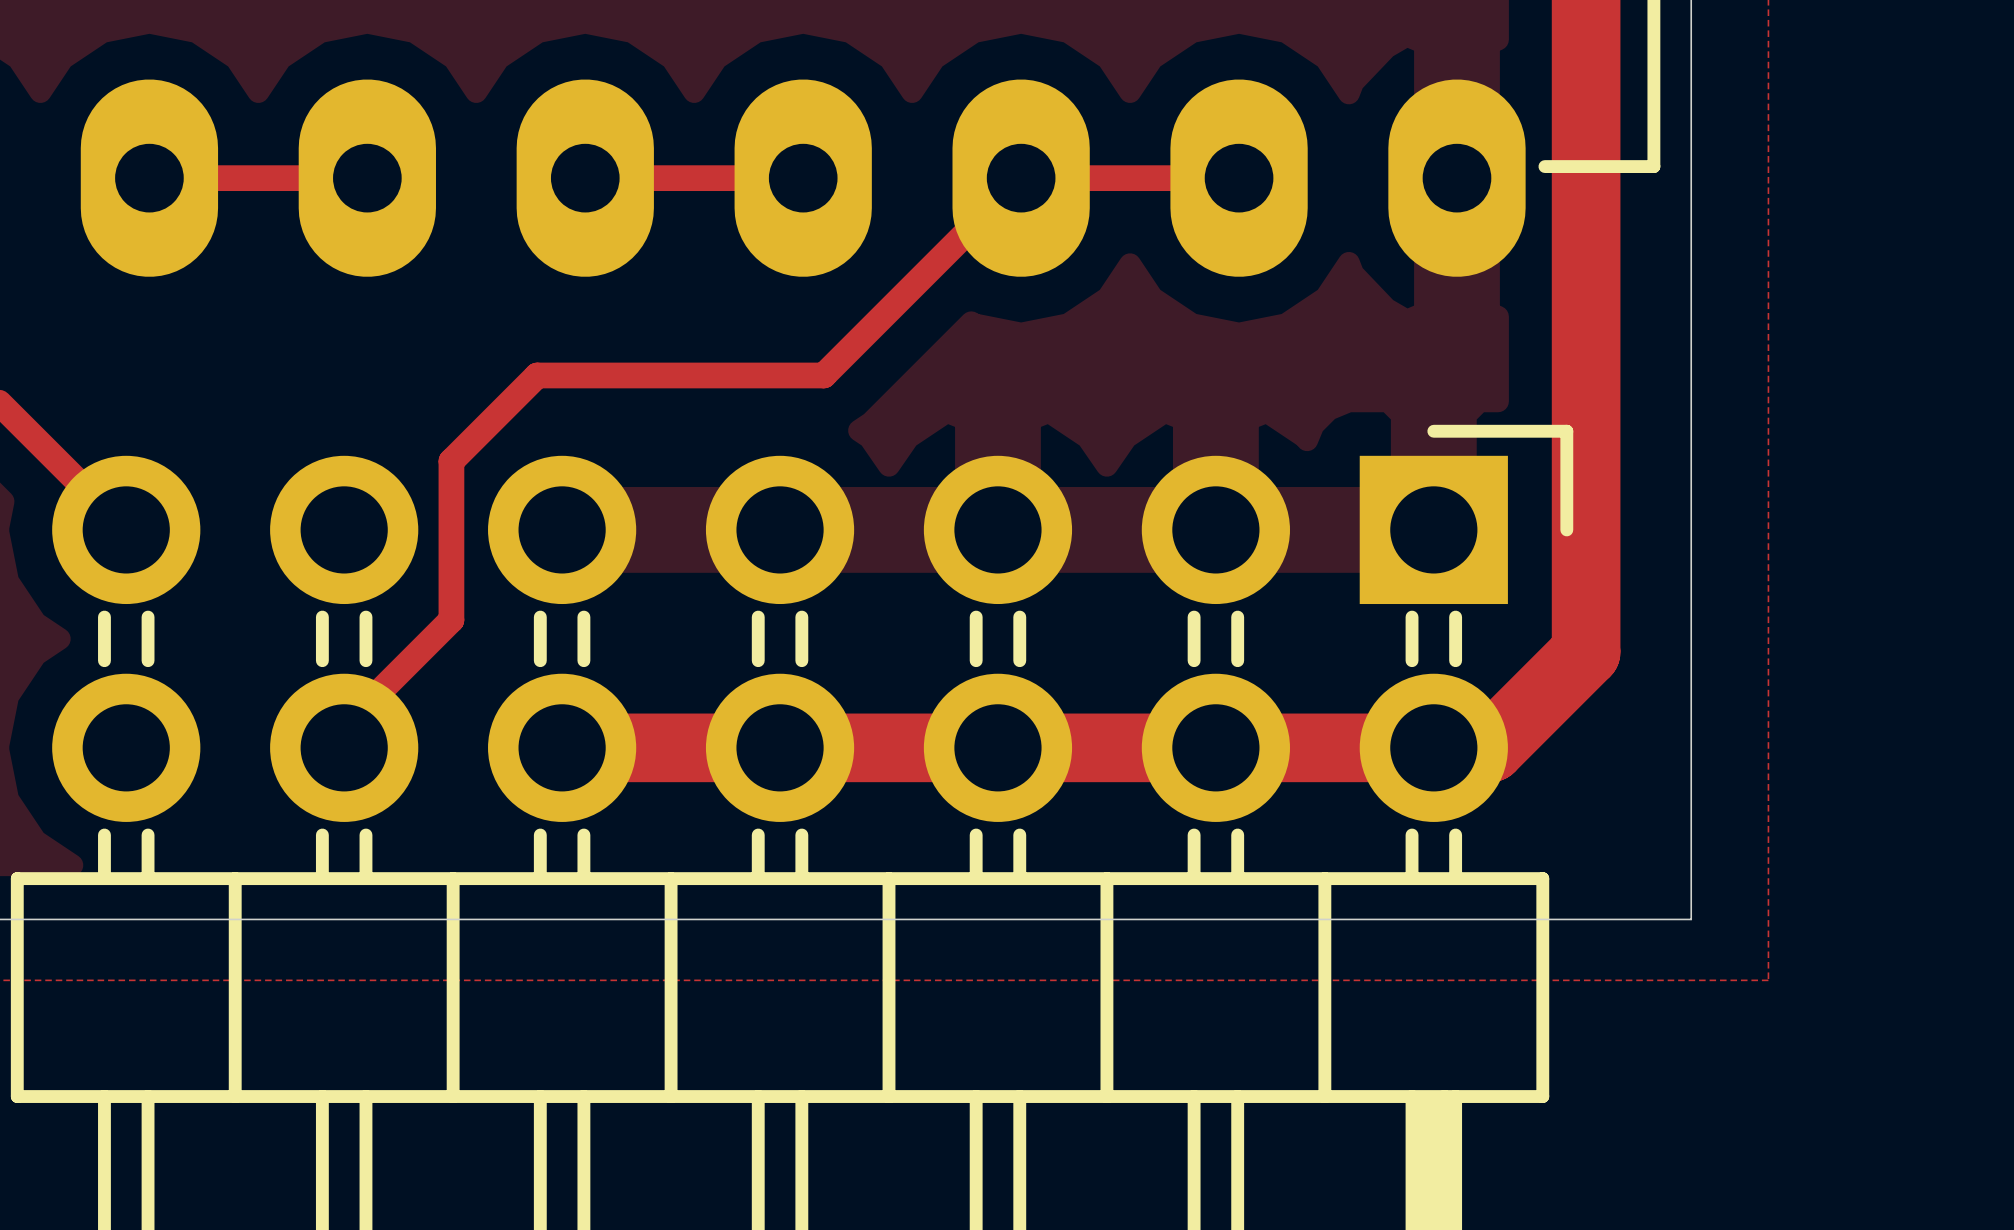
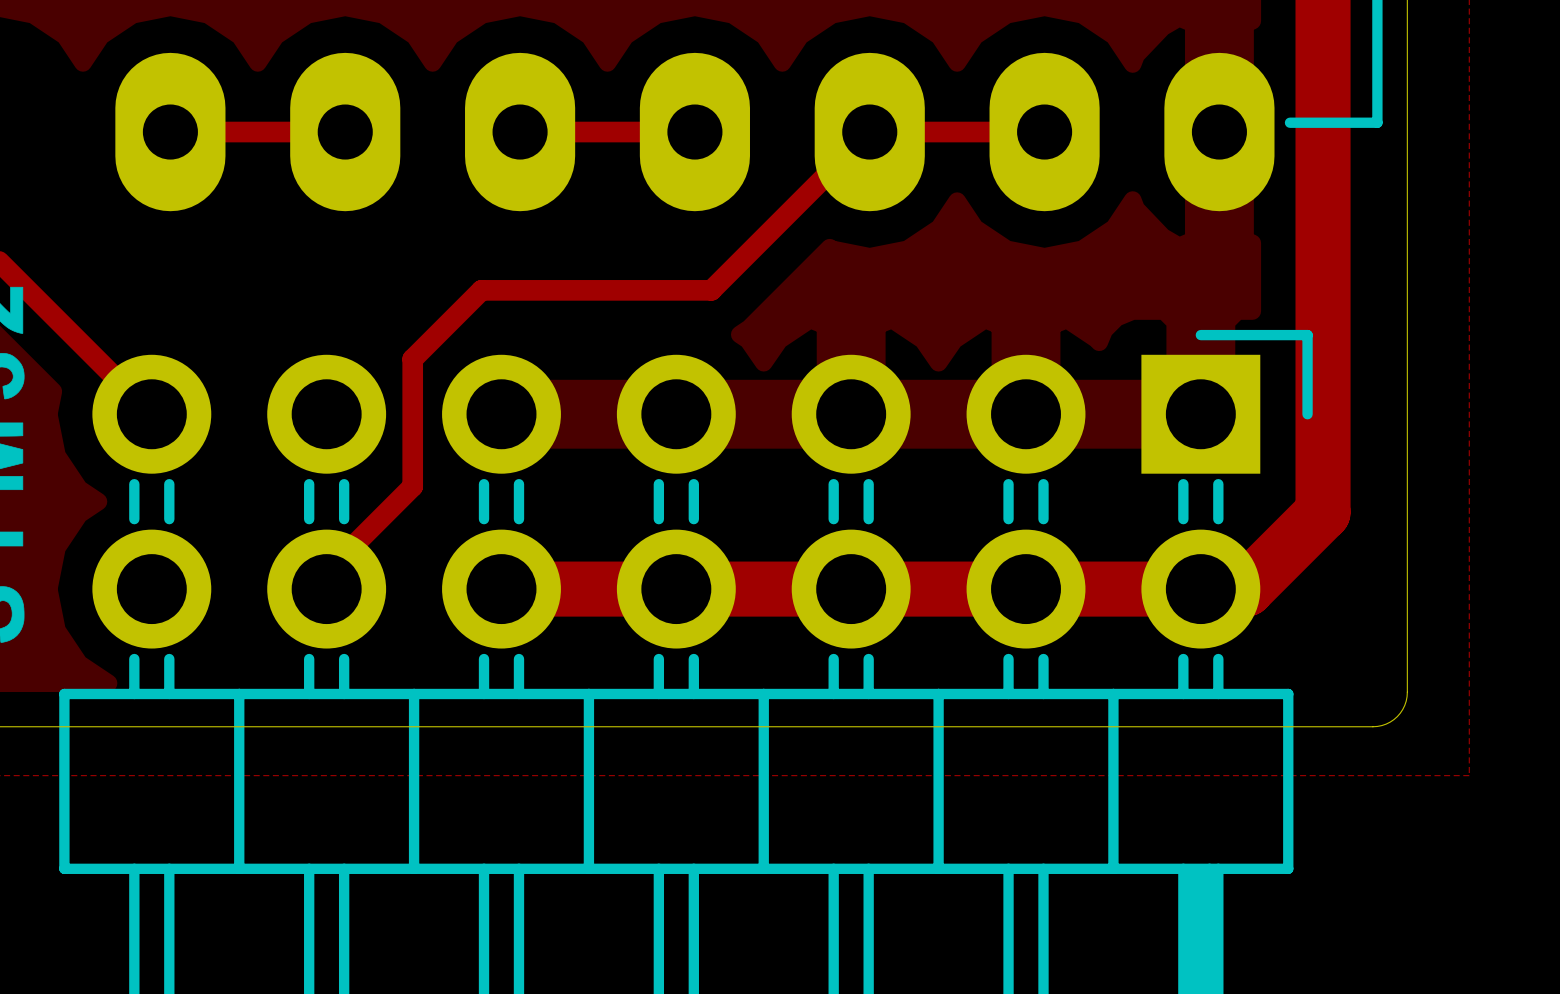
board edge: (1691, 876) (1691, 919) (1648, 919) -> (1407, 692) (1404, 705) (1397, 716) (1386, 724) (1372, 726)

